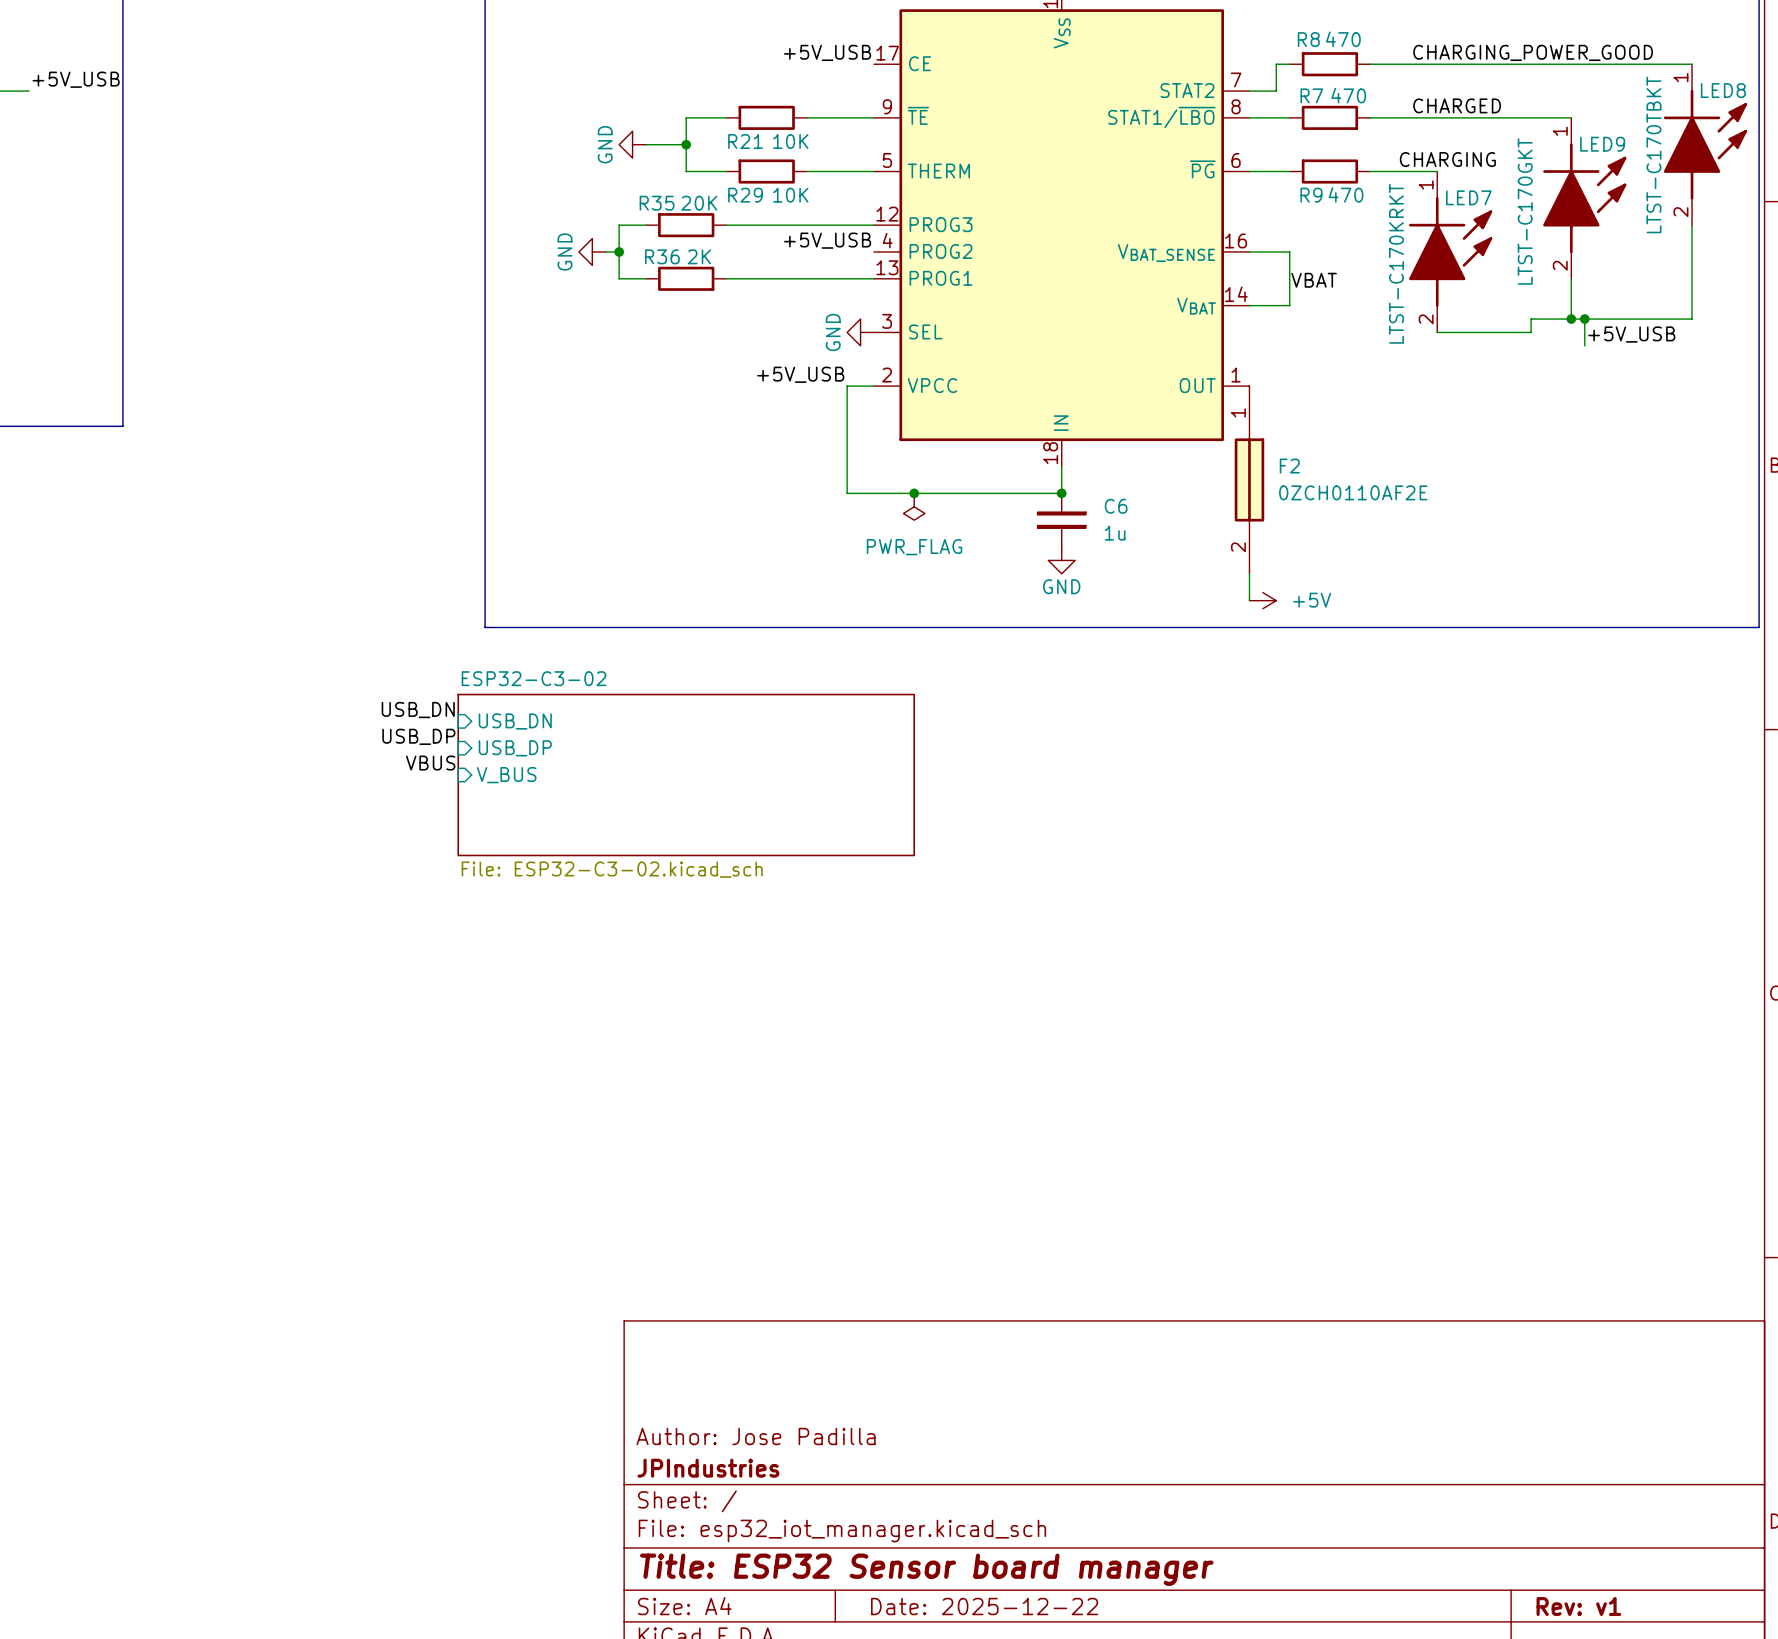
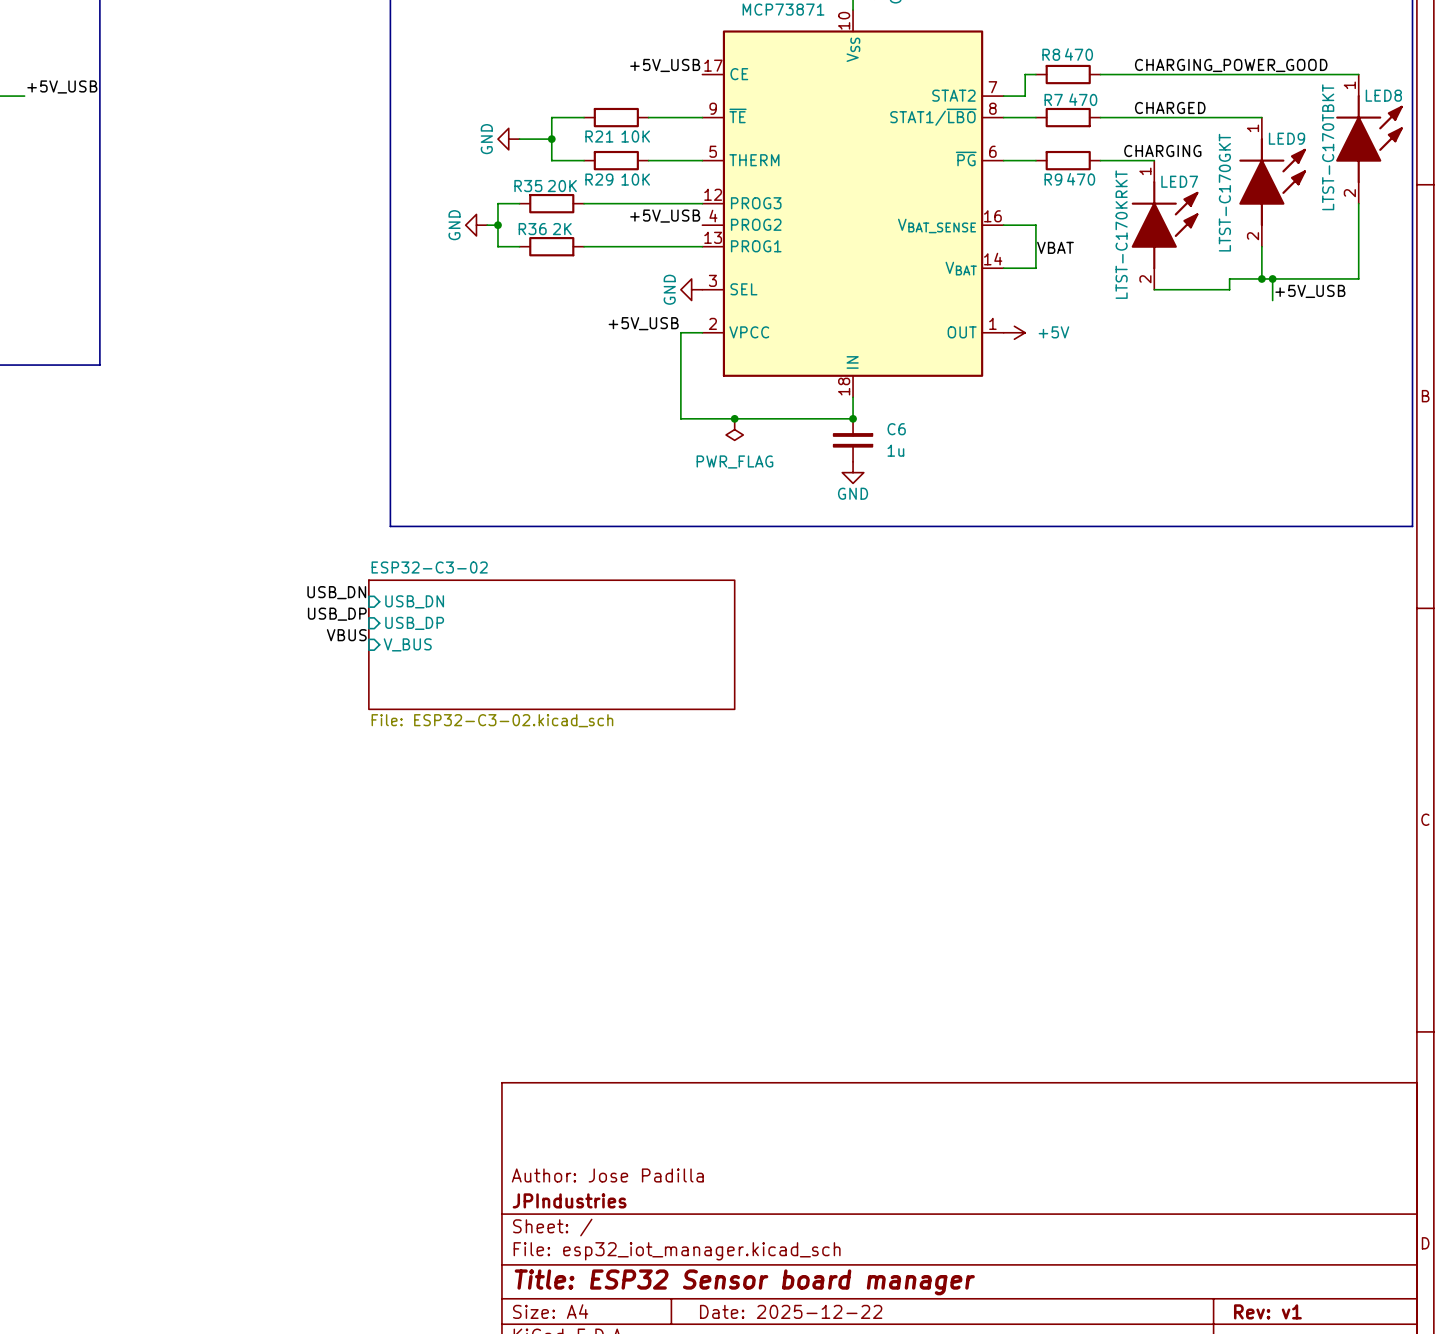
F2: 0ZCH0110AF2E (1249, 479) -> none
wire: (1249, 573) (1249, 600) -> none
power symbol position: +5V (1262, 600) -> +5V (1014, 332)

